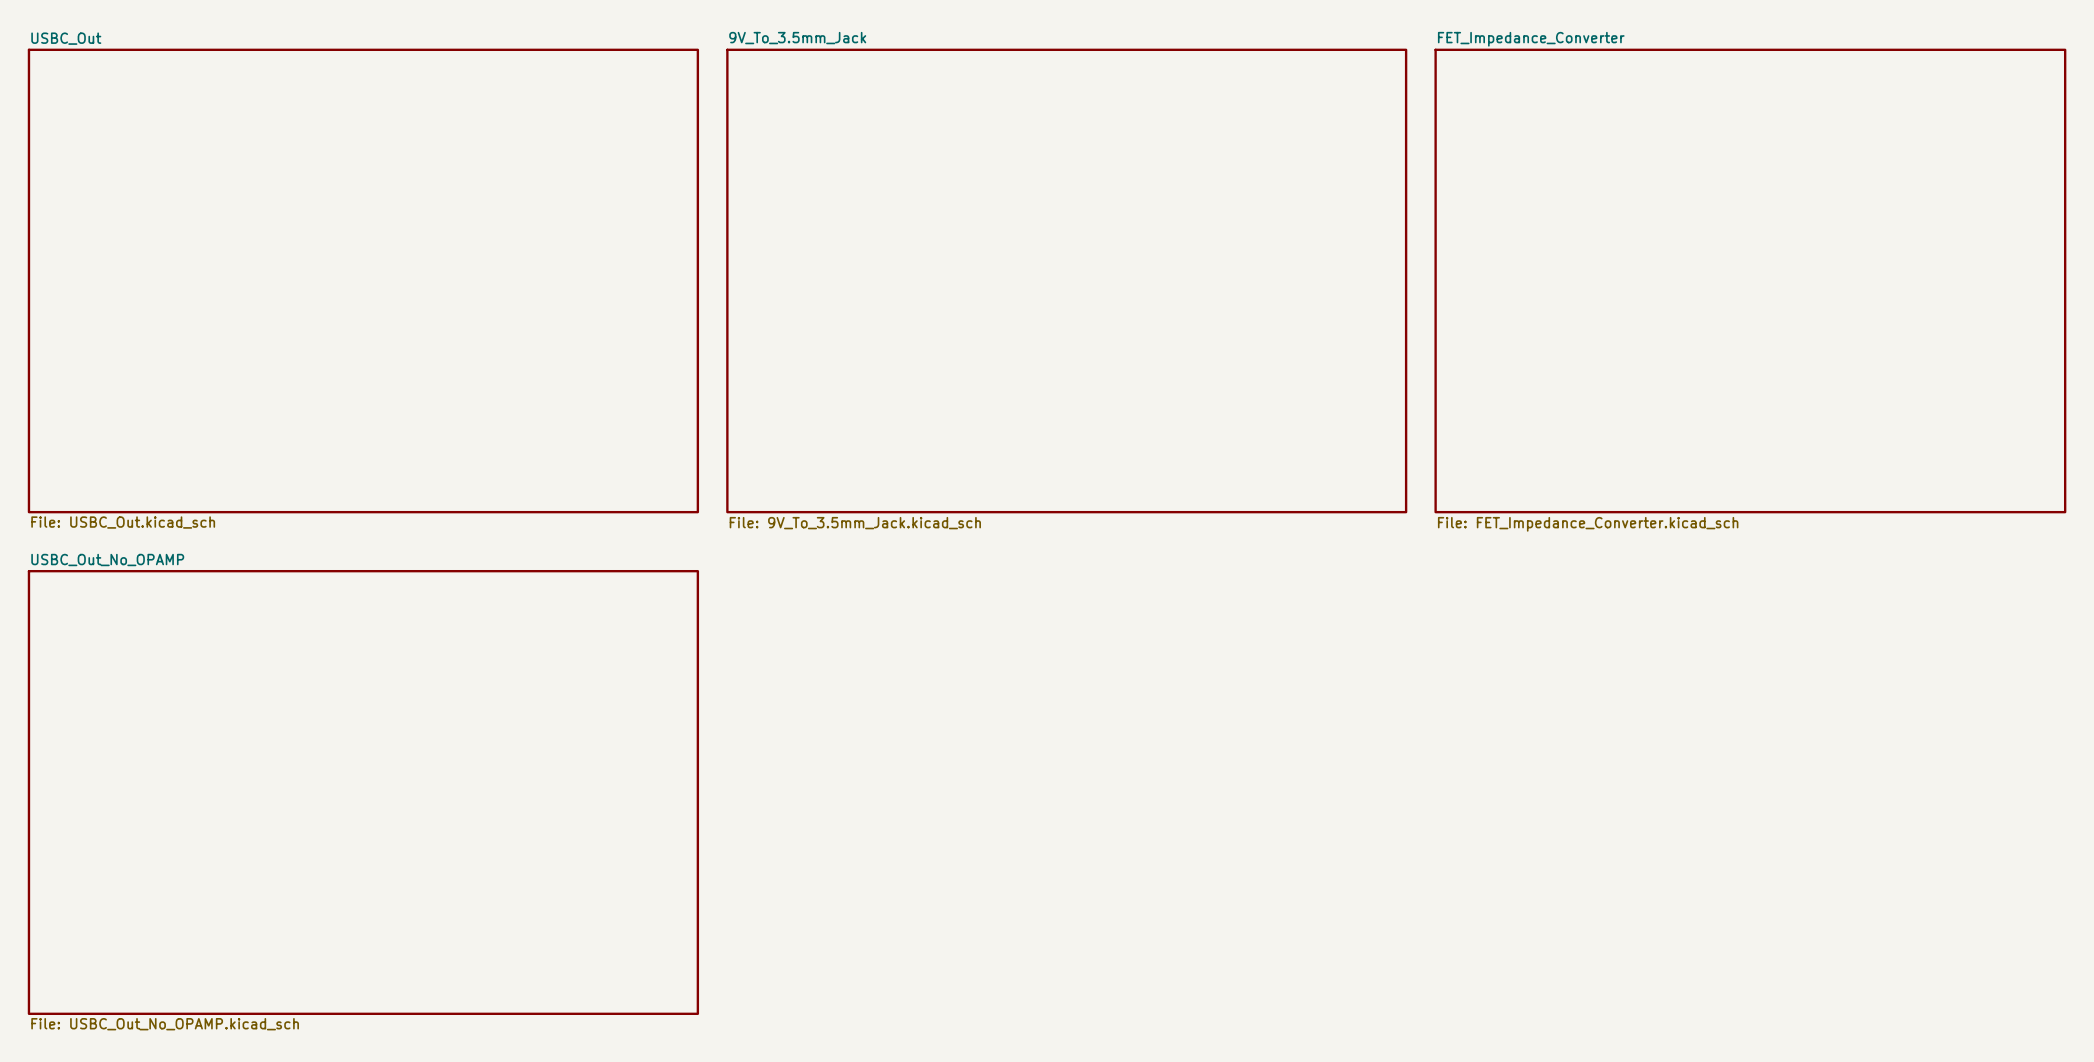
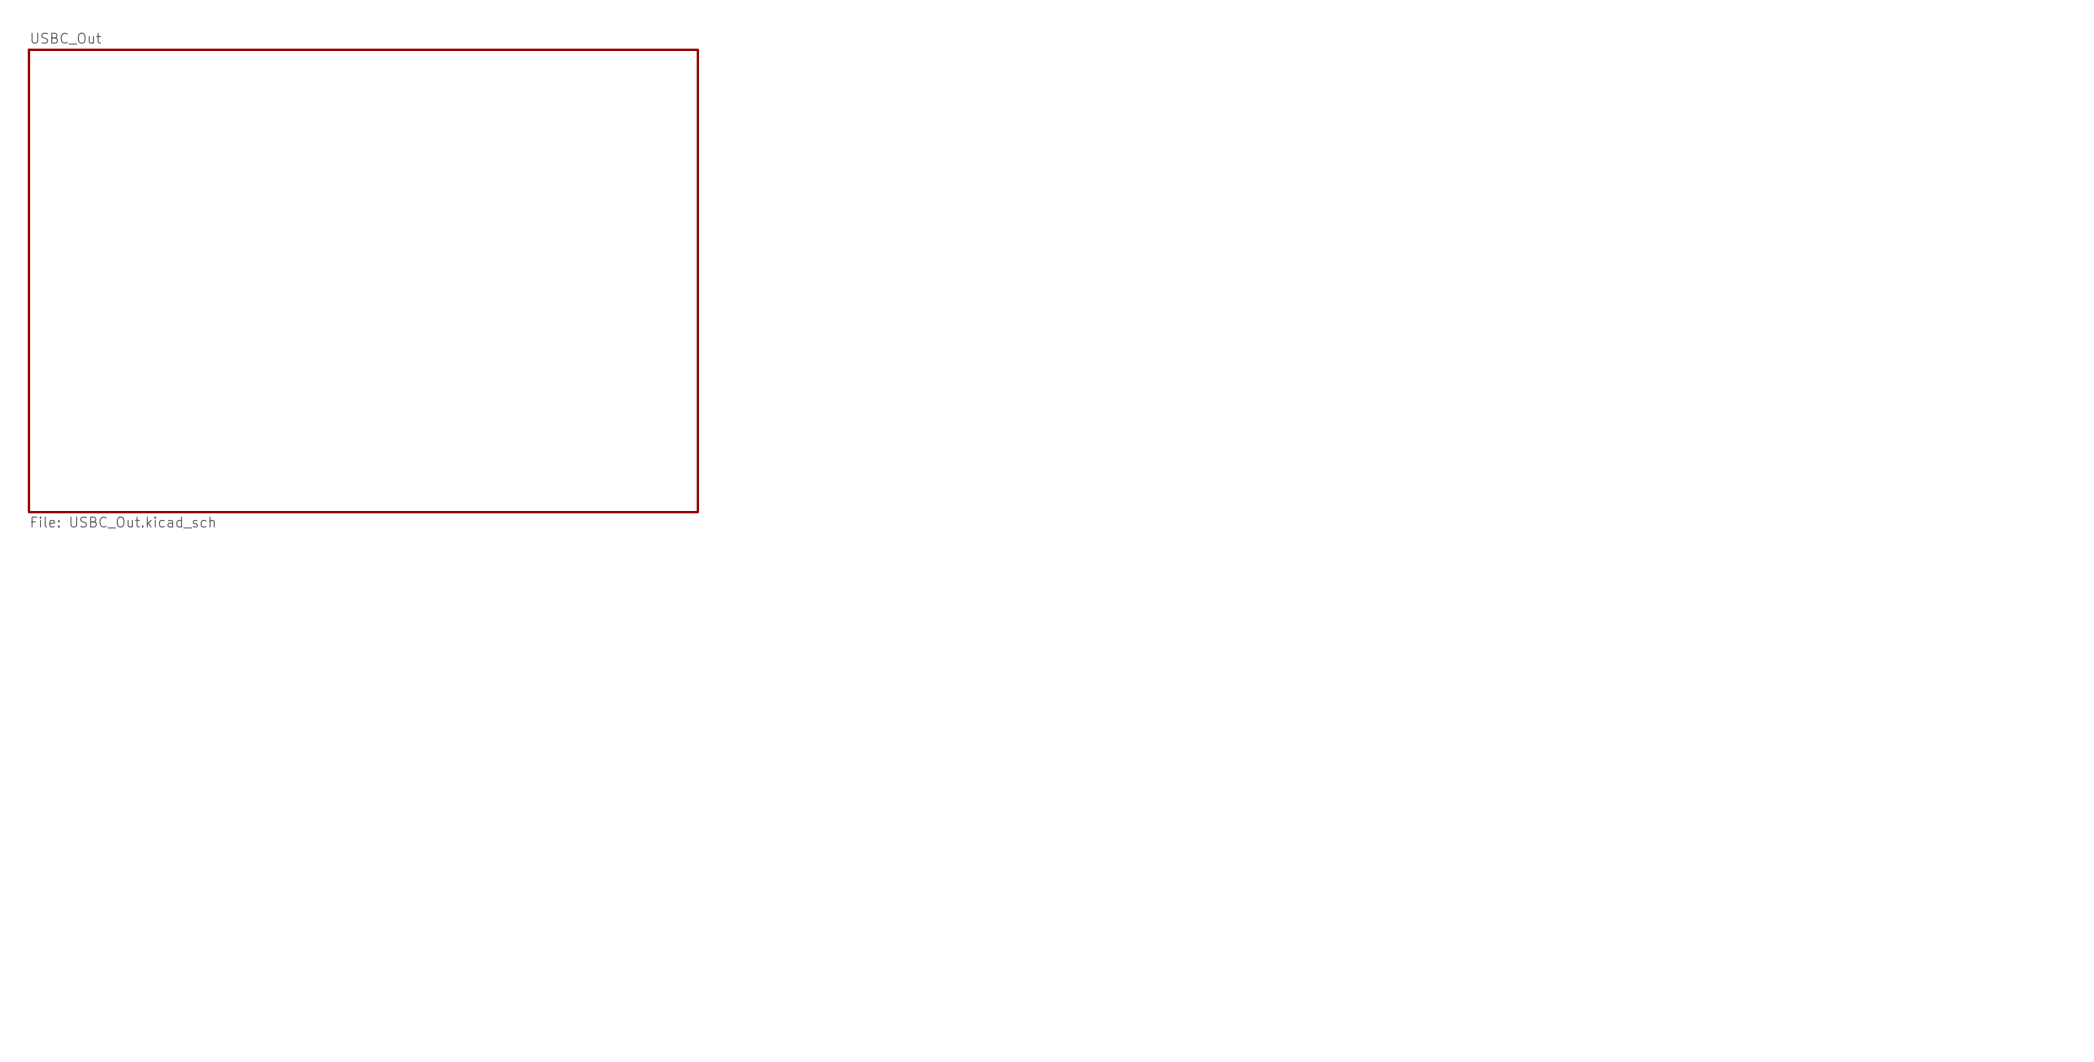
sheet 9V_To_3.5mm_Jack: File: 9V_To_3.5mm_Jack.kicad_sch (1066, 280) -> none
sheet FET_Impedance_Converter: File: FET_Impedance_Converter.kicad_sch (1750, 280) -> none
sheet USBC_Out_No_OPAMP: File: USBC_Out_No_OPAMP.kicad_sch (363, 792) -> none

